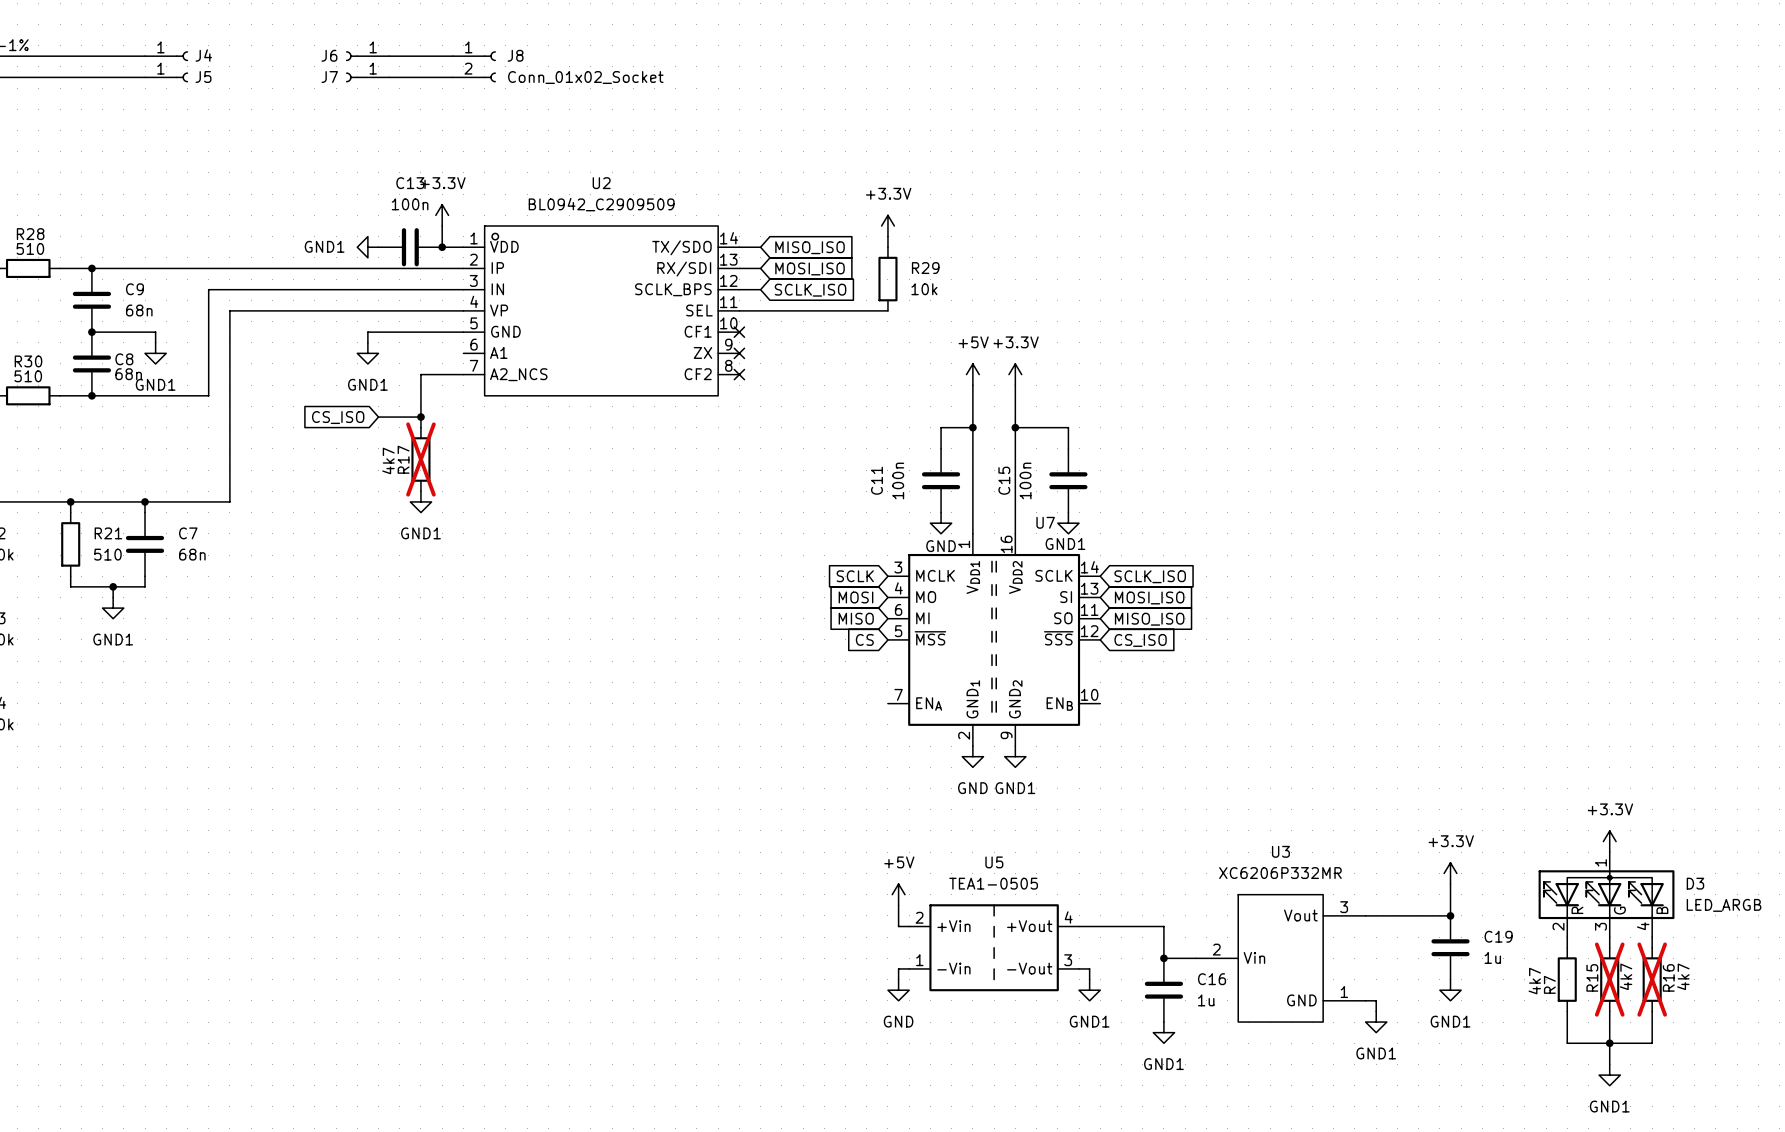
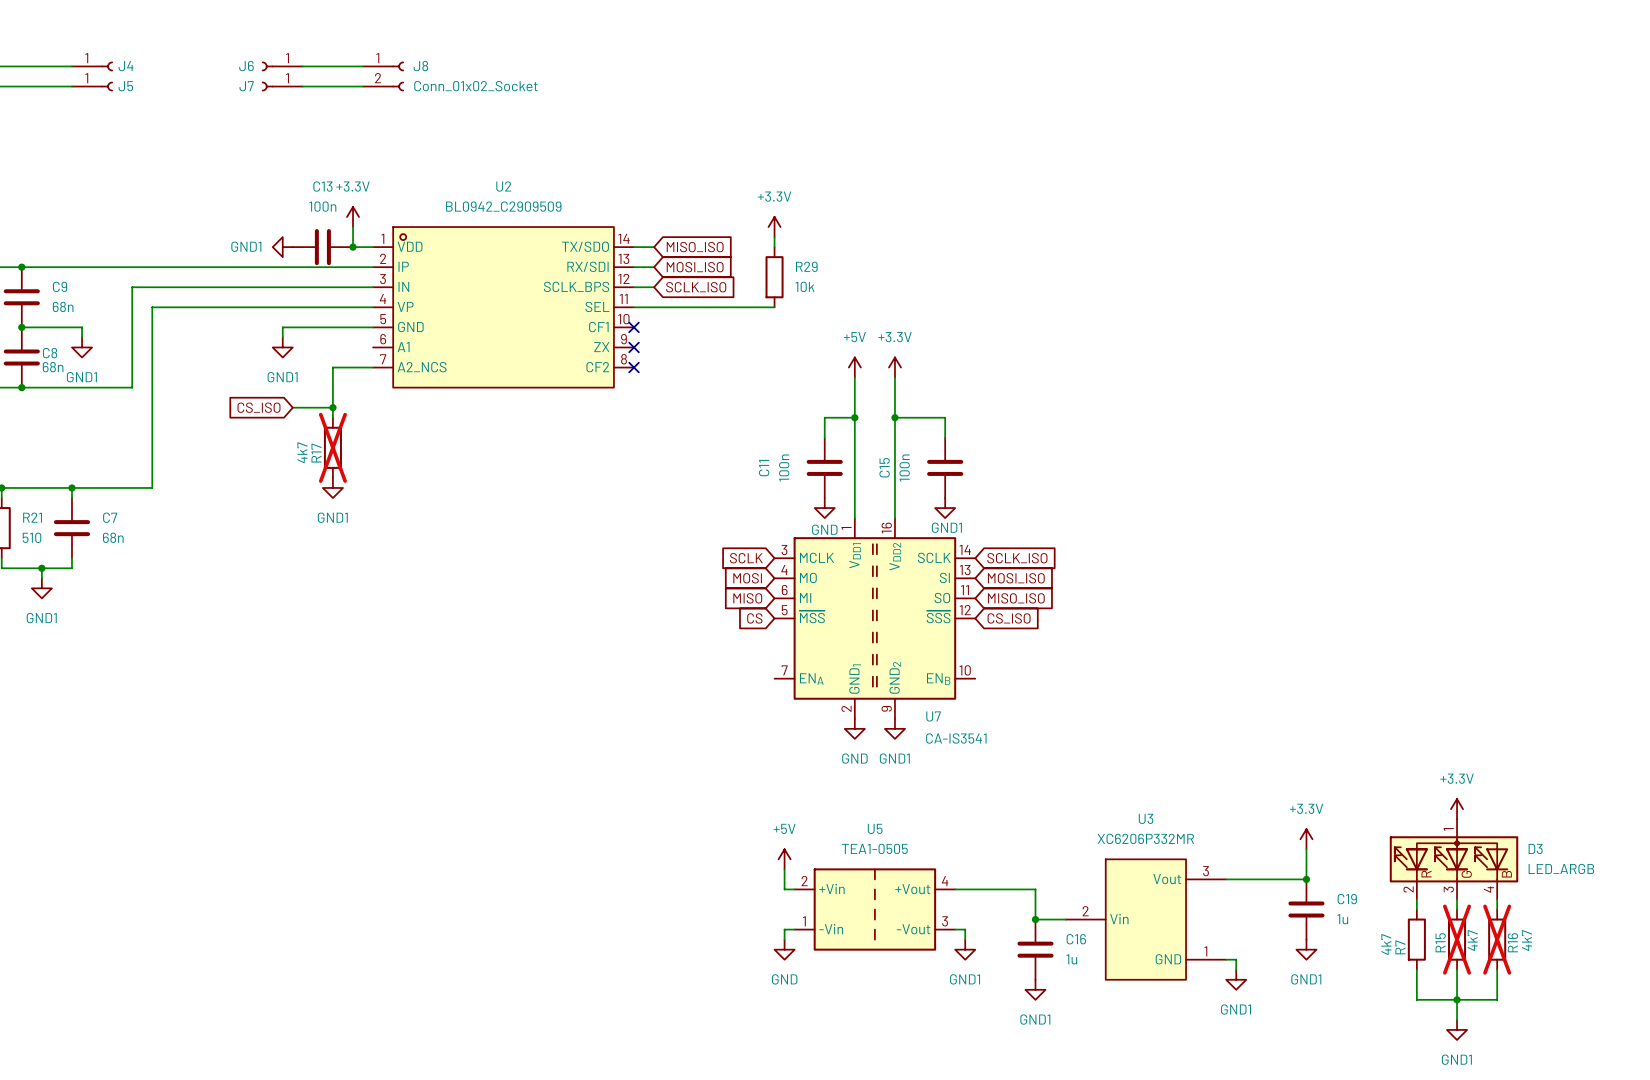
U7 name position: U7 (1045, 522) -> U7 (933, 716)
U7 value: none -> CA-IS3541 (956, 738)

